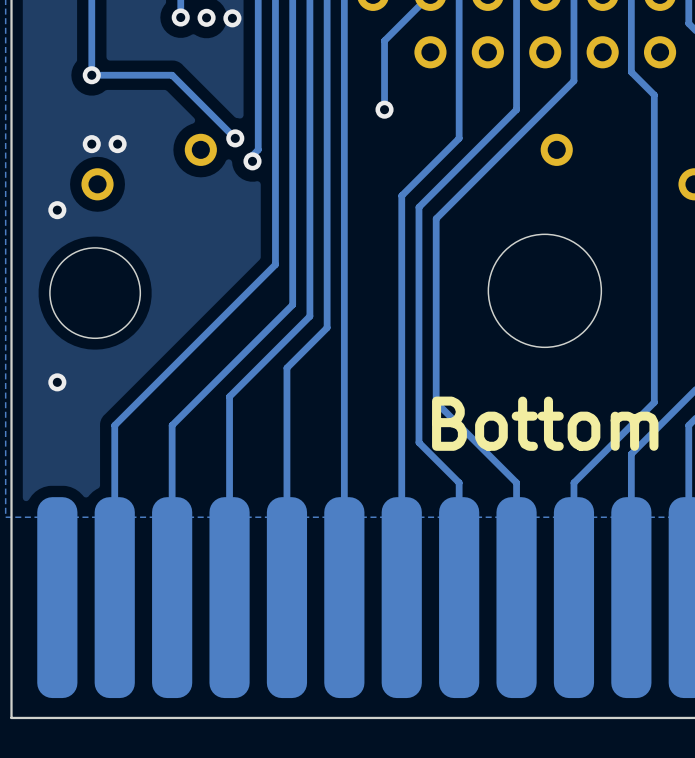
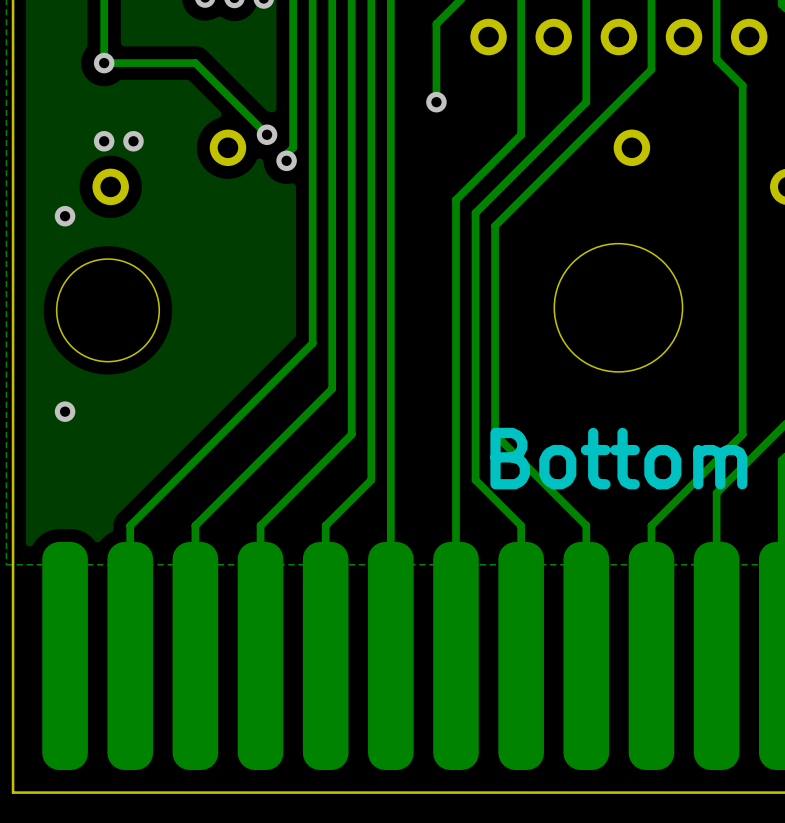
track: (275, 264) (114, 425) (114, 482) -> none
track: (292, 304) (275, 322) -> (312, 278) (312, 343)
track: (309, 316) (229, 396) (229, 482) -> (351, 336) (351, 434) (260, 525)
track: (327, 327) (292, 362) -> (332, 323) (332, 388)
track: (286, 367) (286, 482) -> (371, 349) (371, 480) (325, 525)
track: none -> (325, 395) (195, 525)
track: (172, 425) (172, 482) -> (195, 460) (130, 525)

